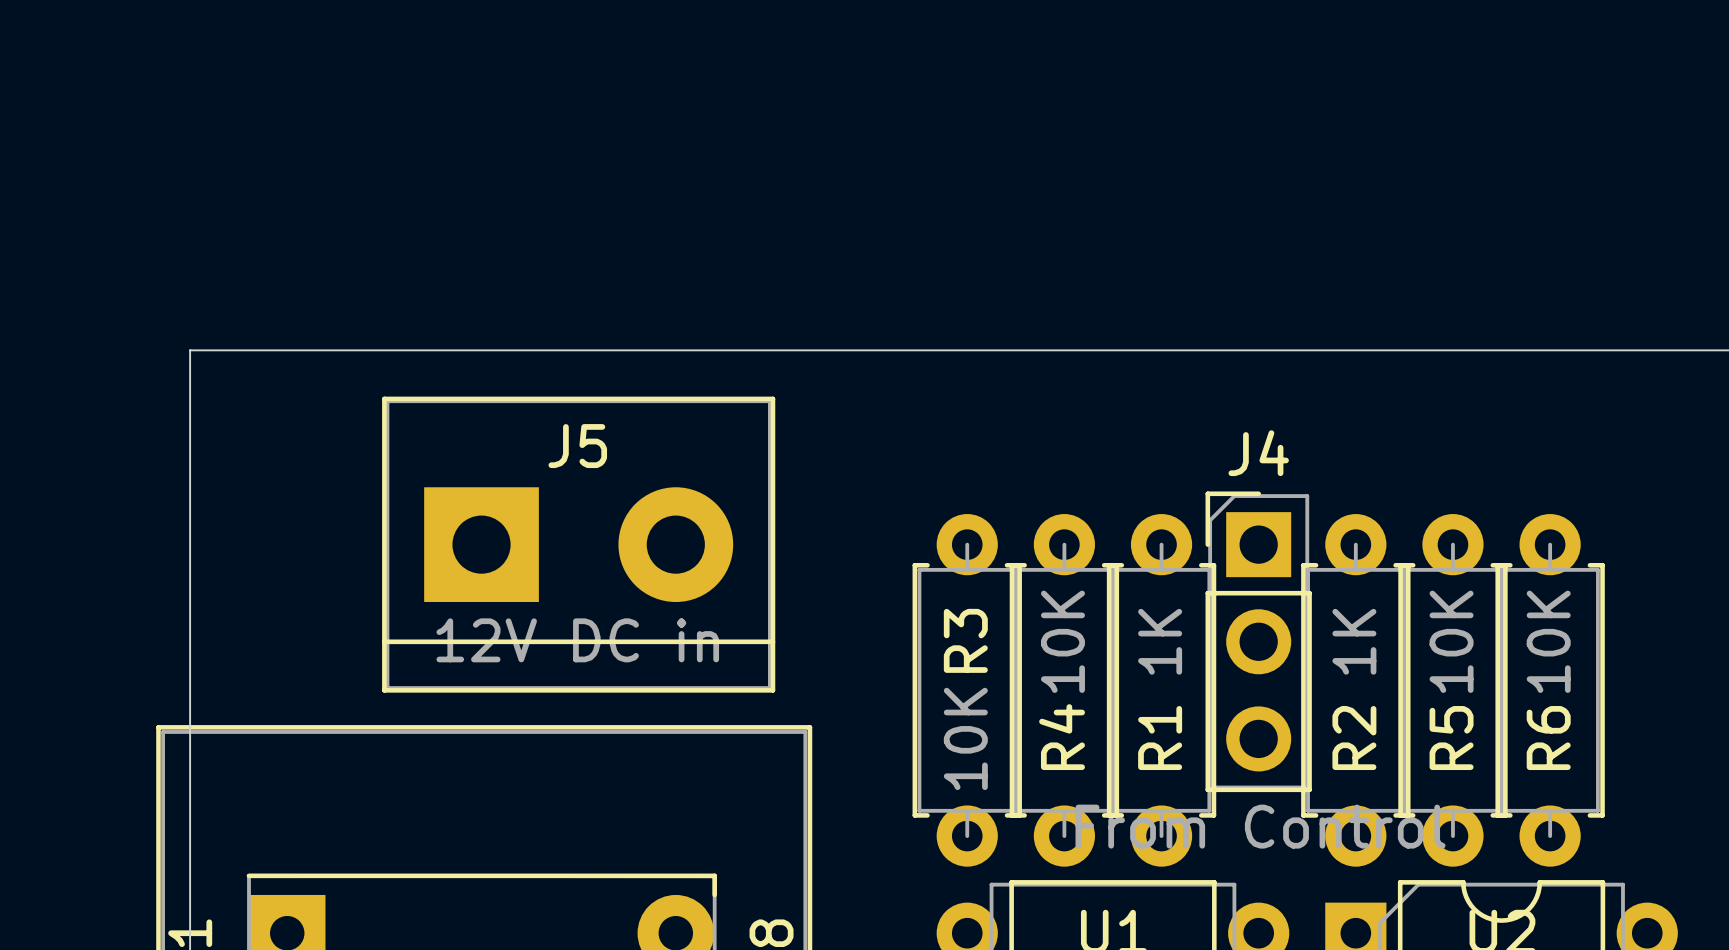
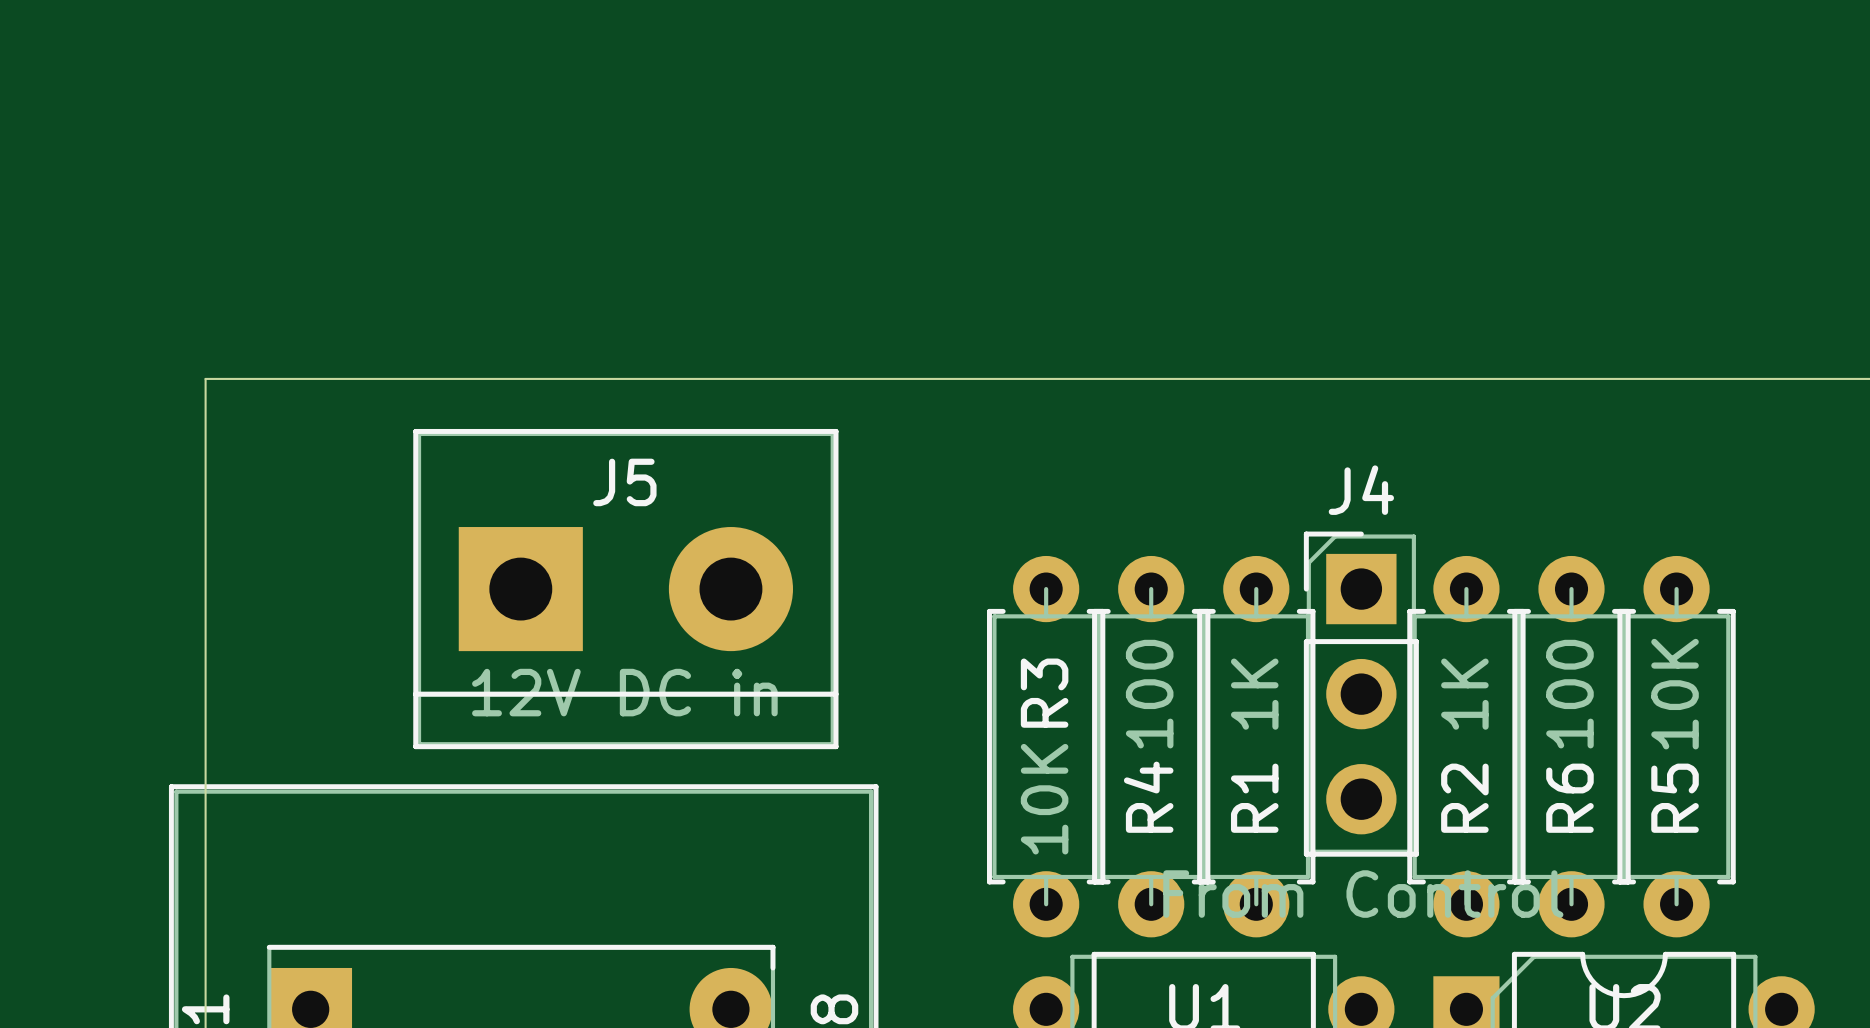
R4 value: 10K (1062, 641) -> 100 (1149, 694)
R5 value: 10K (1451, 641) -> 100 (1569, 694)
R5 name: R5 (1451, 738) -> R6 (1569, 798)
R6 name: R6 (1548, 738) -> R5 (1675, 798)

